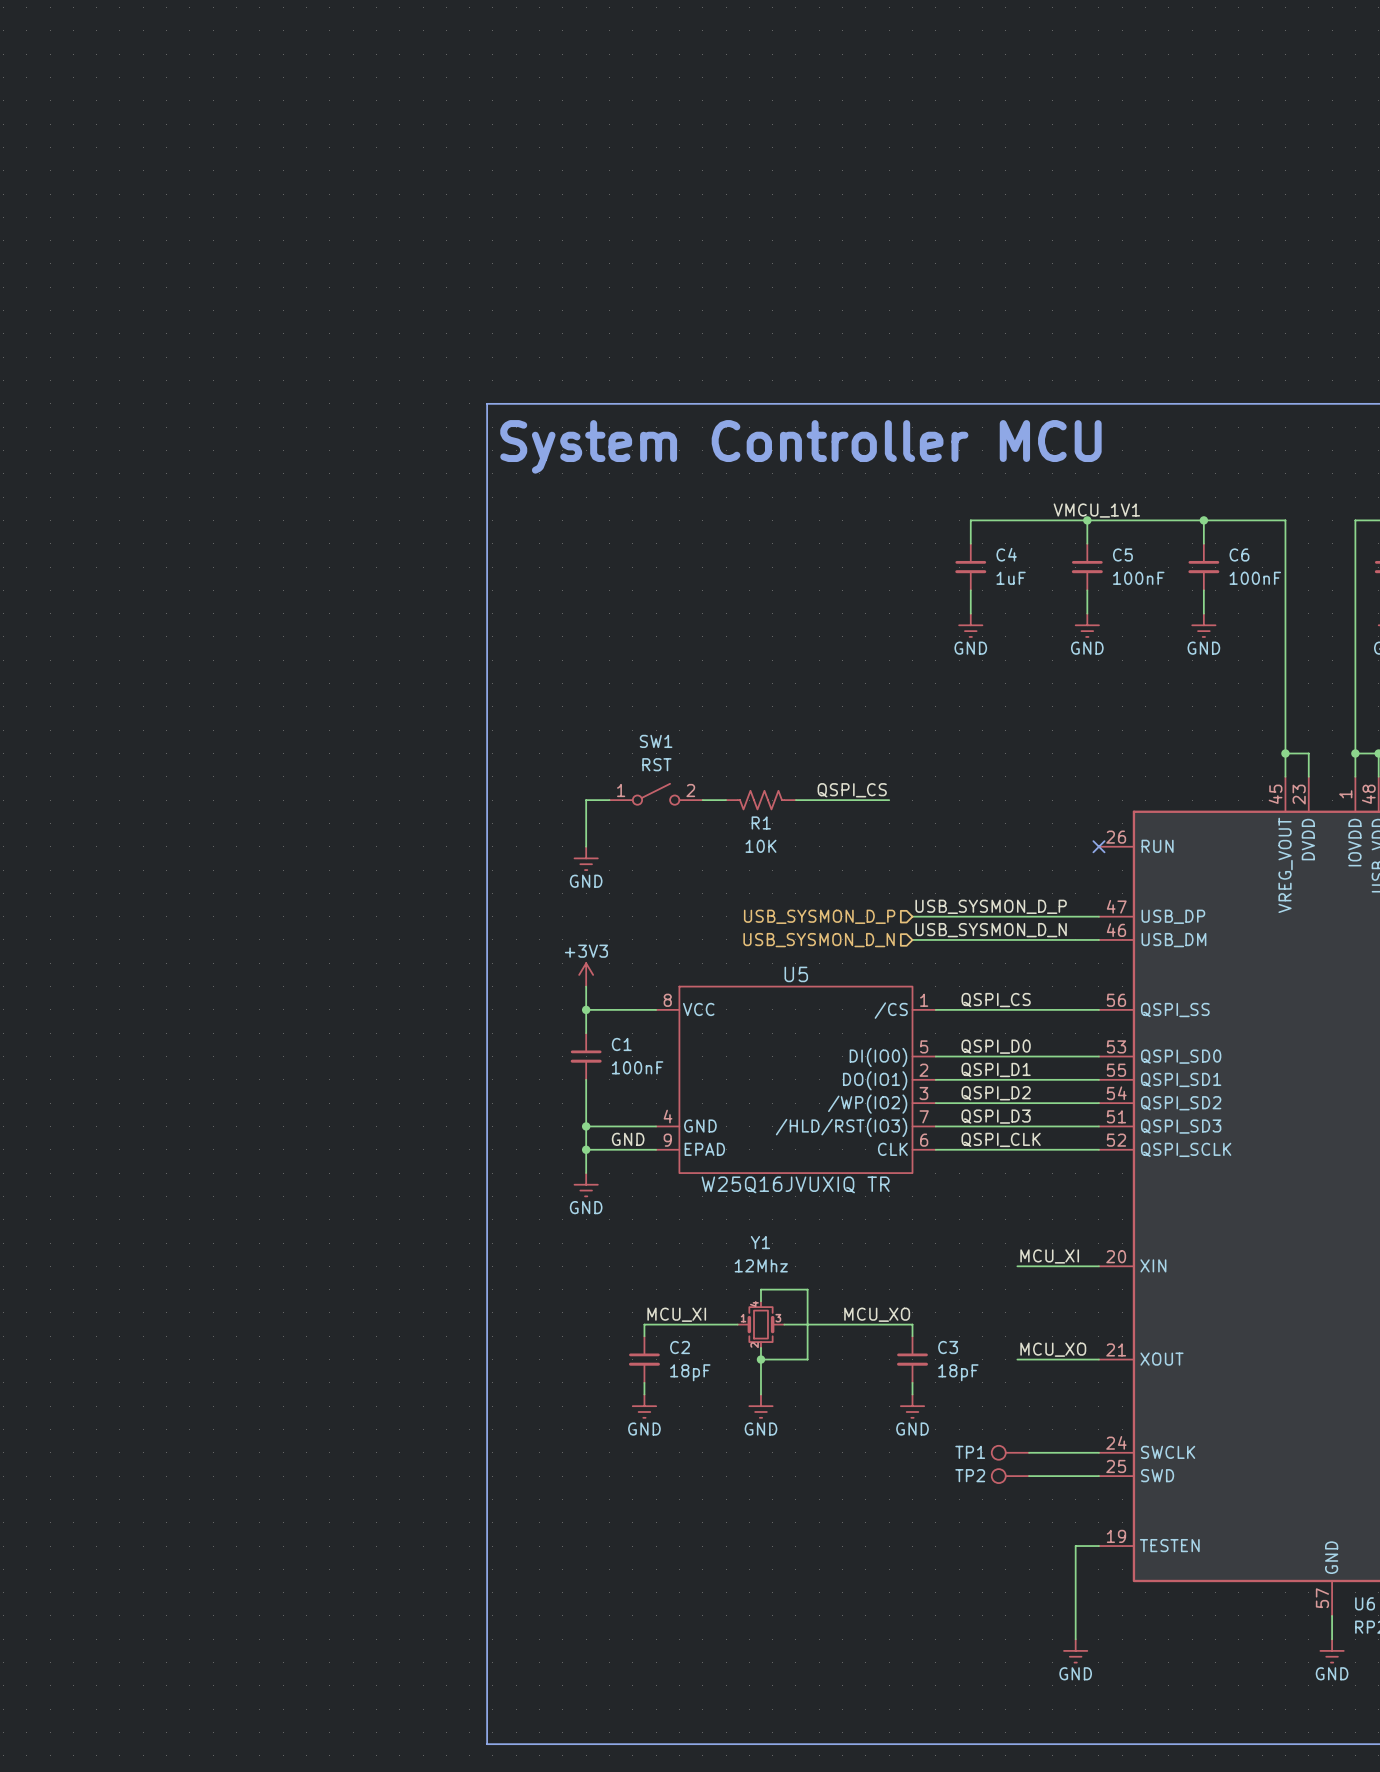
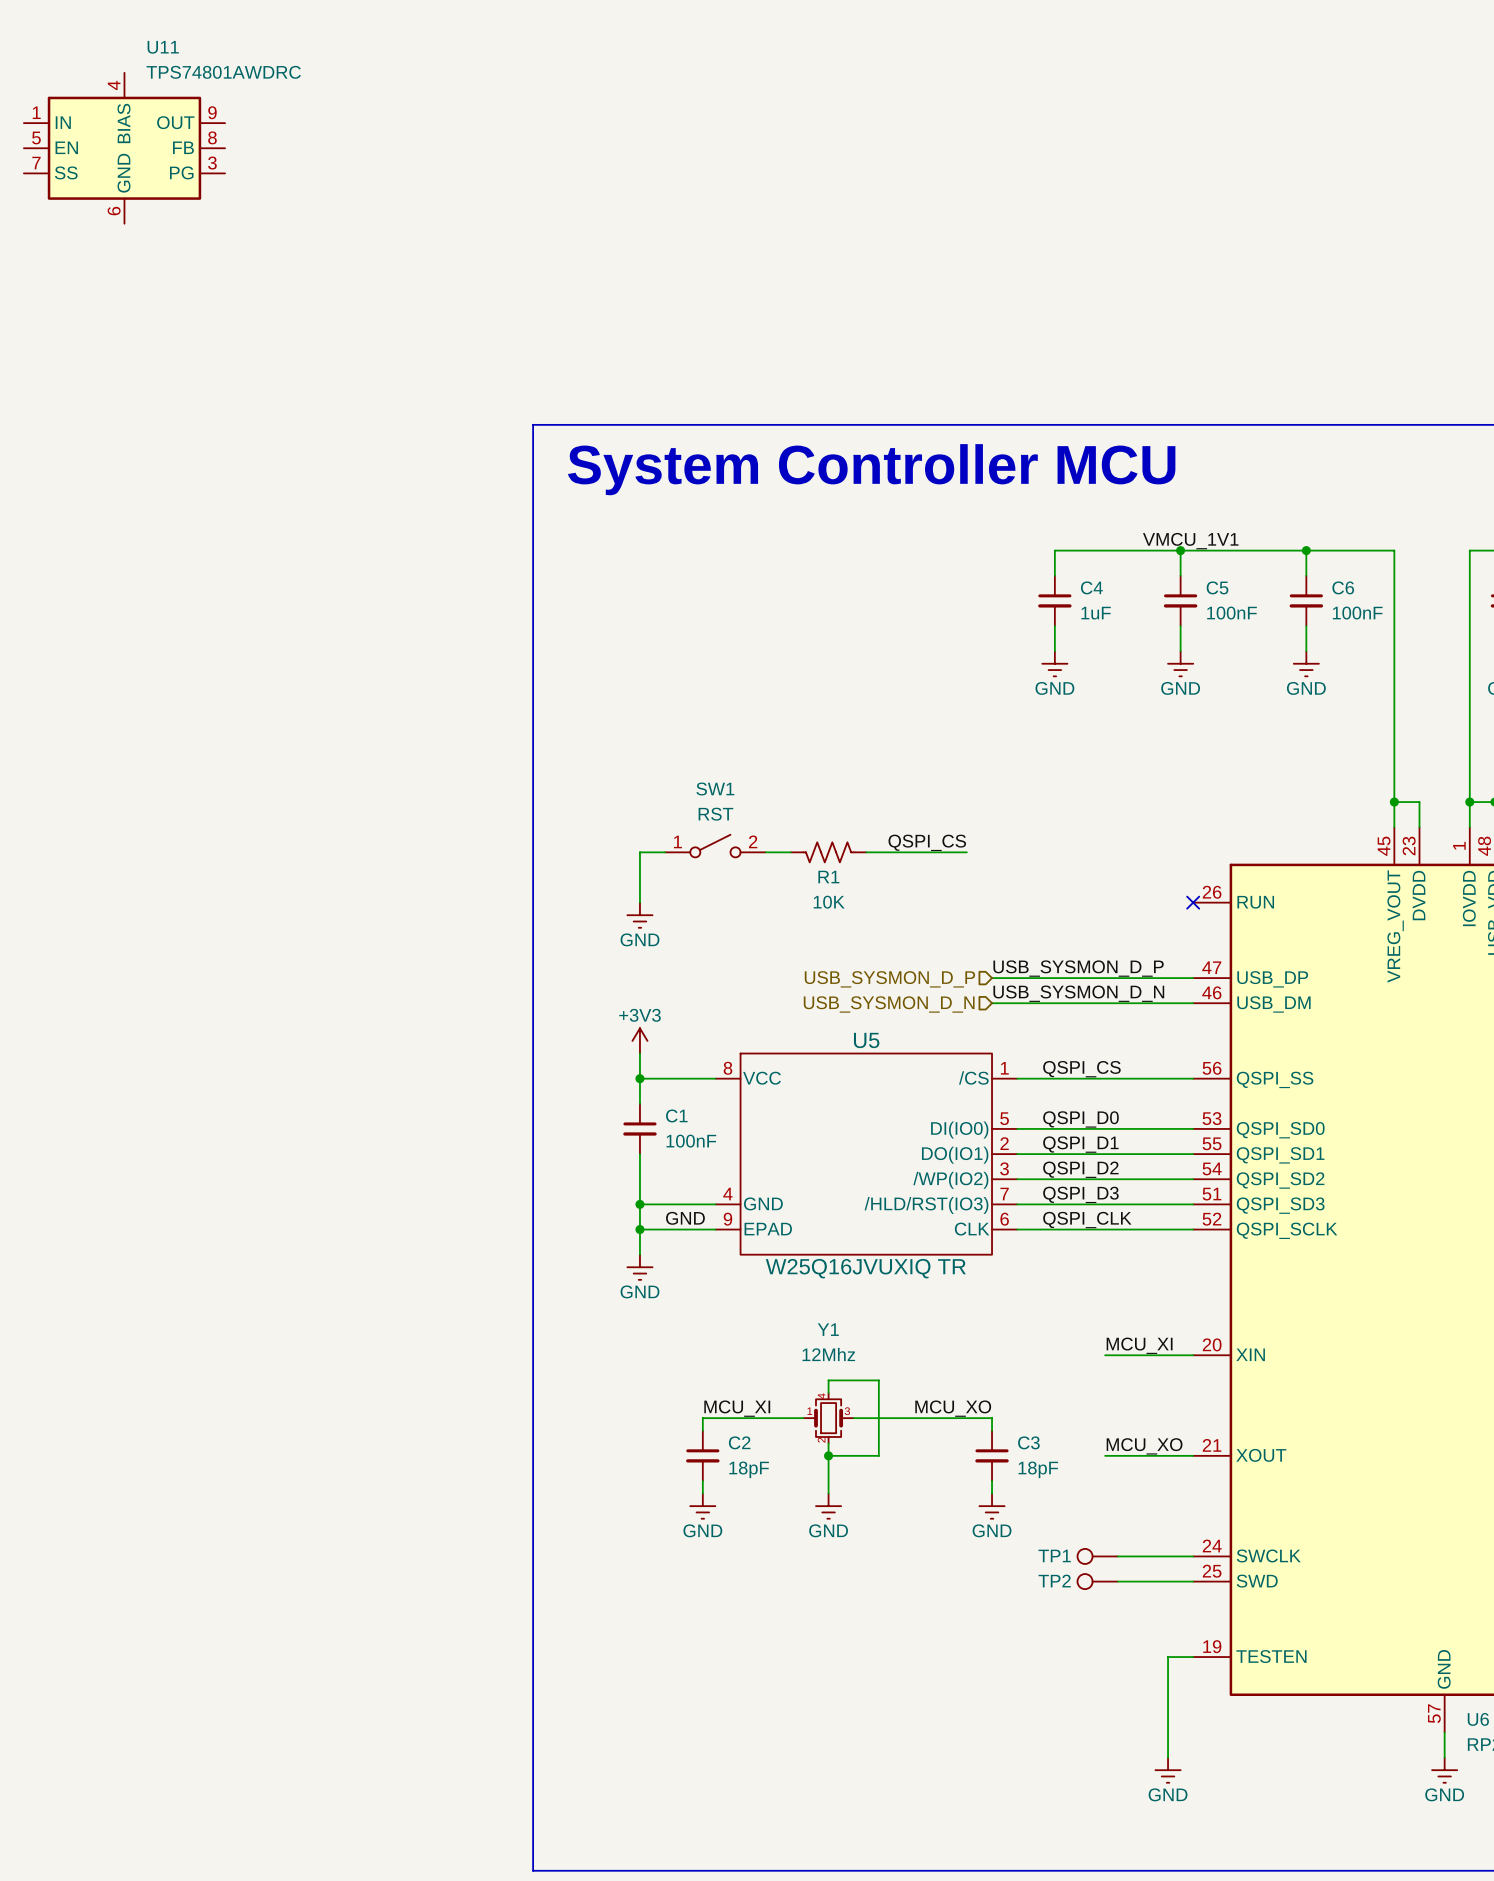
U11: none -> TPS74801AWDRC (124, 148)

